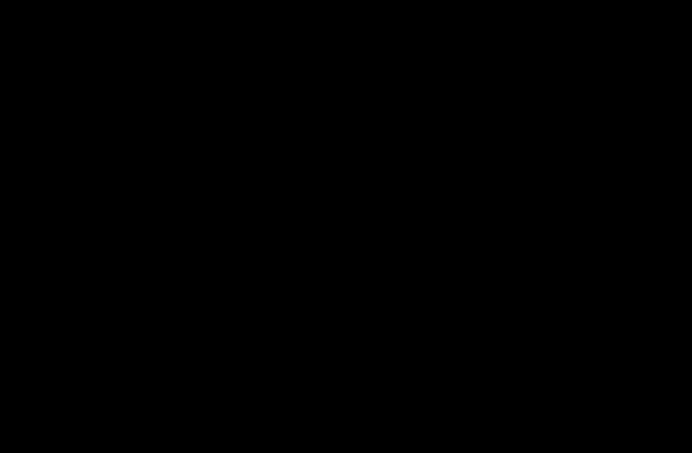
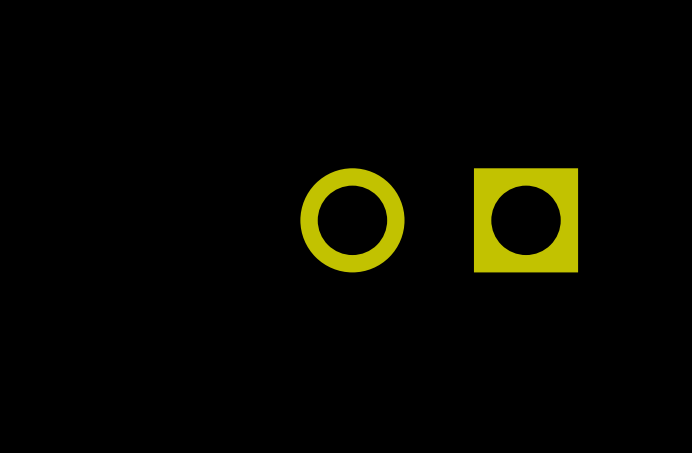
part: none -> (439, 220)

